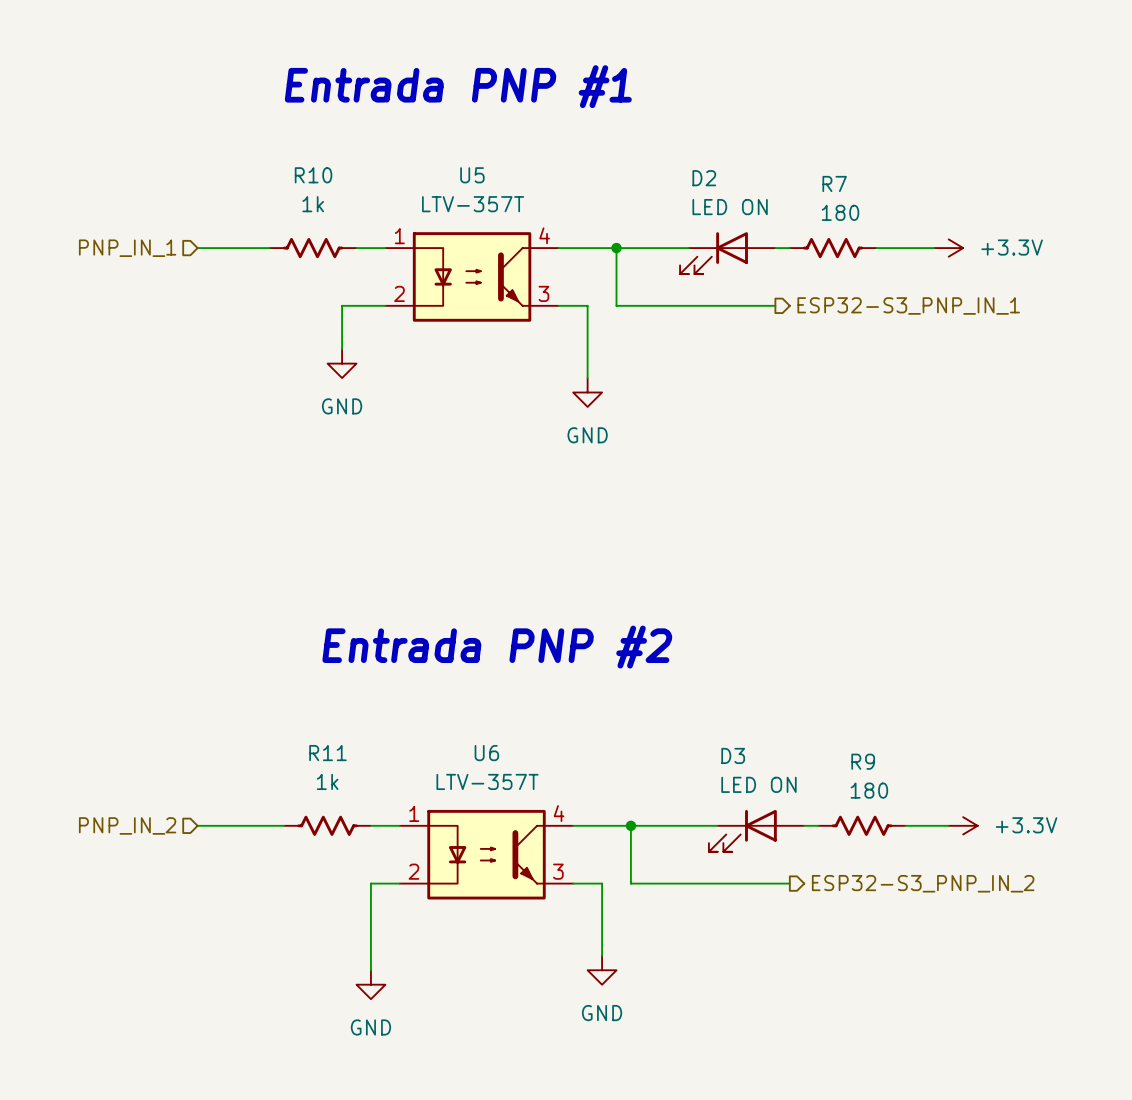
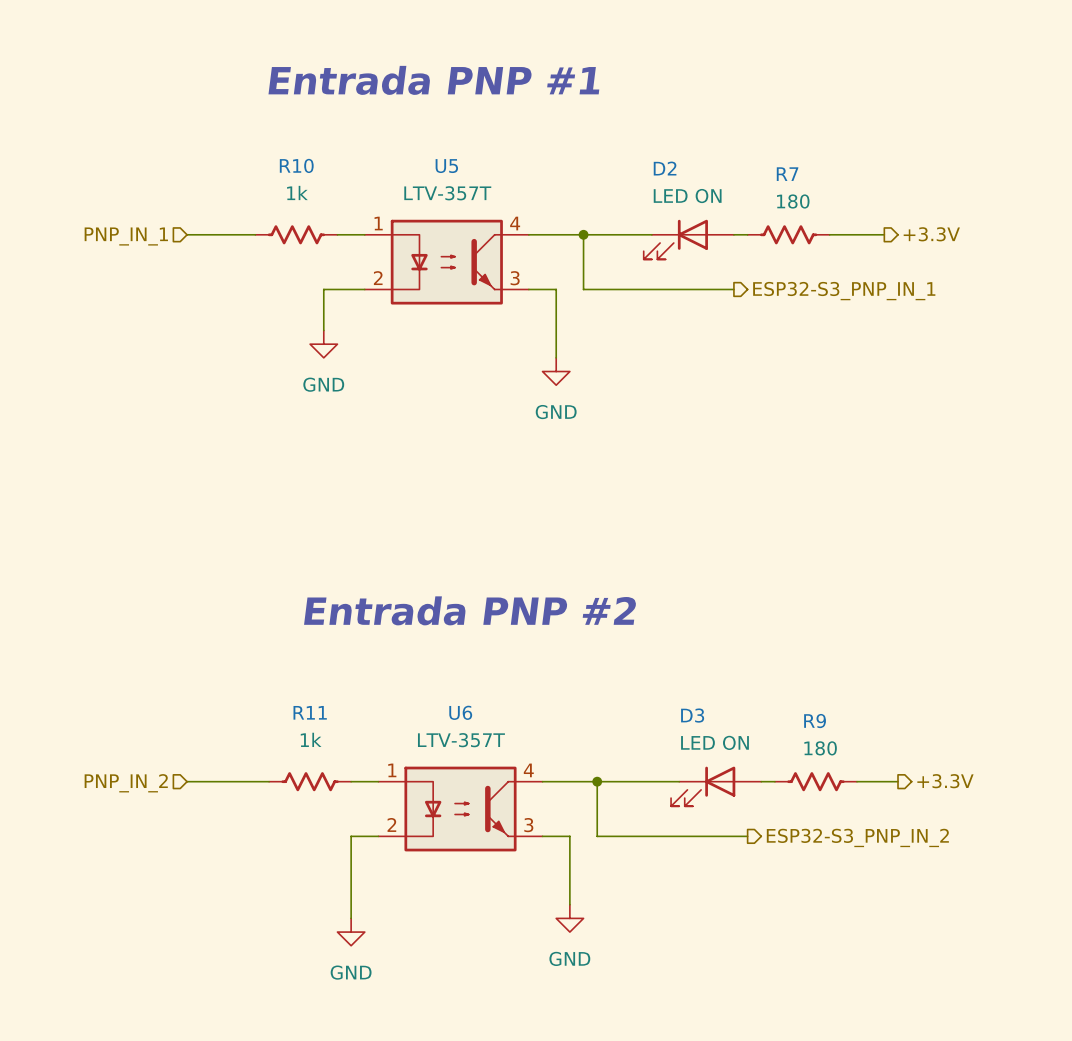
hierarchical label: none -> +3.3V (931, 234)
power symbol: +3.3V (948, 248) -> none
power symbol: +3.3V (963, 825) -> none
hierarchical label: none -> +3.3V (945, 781)

